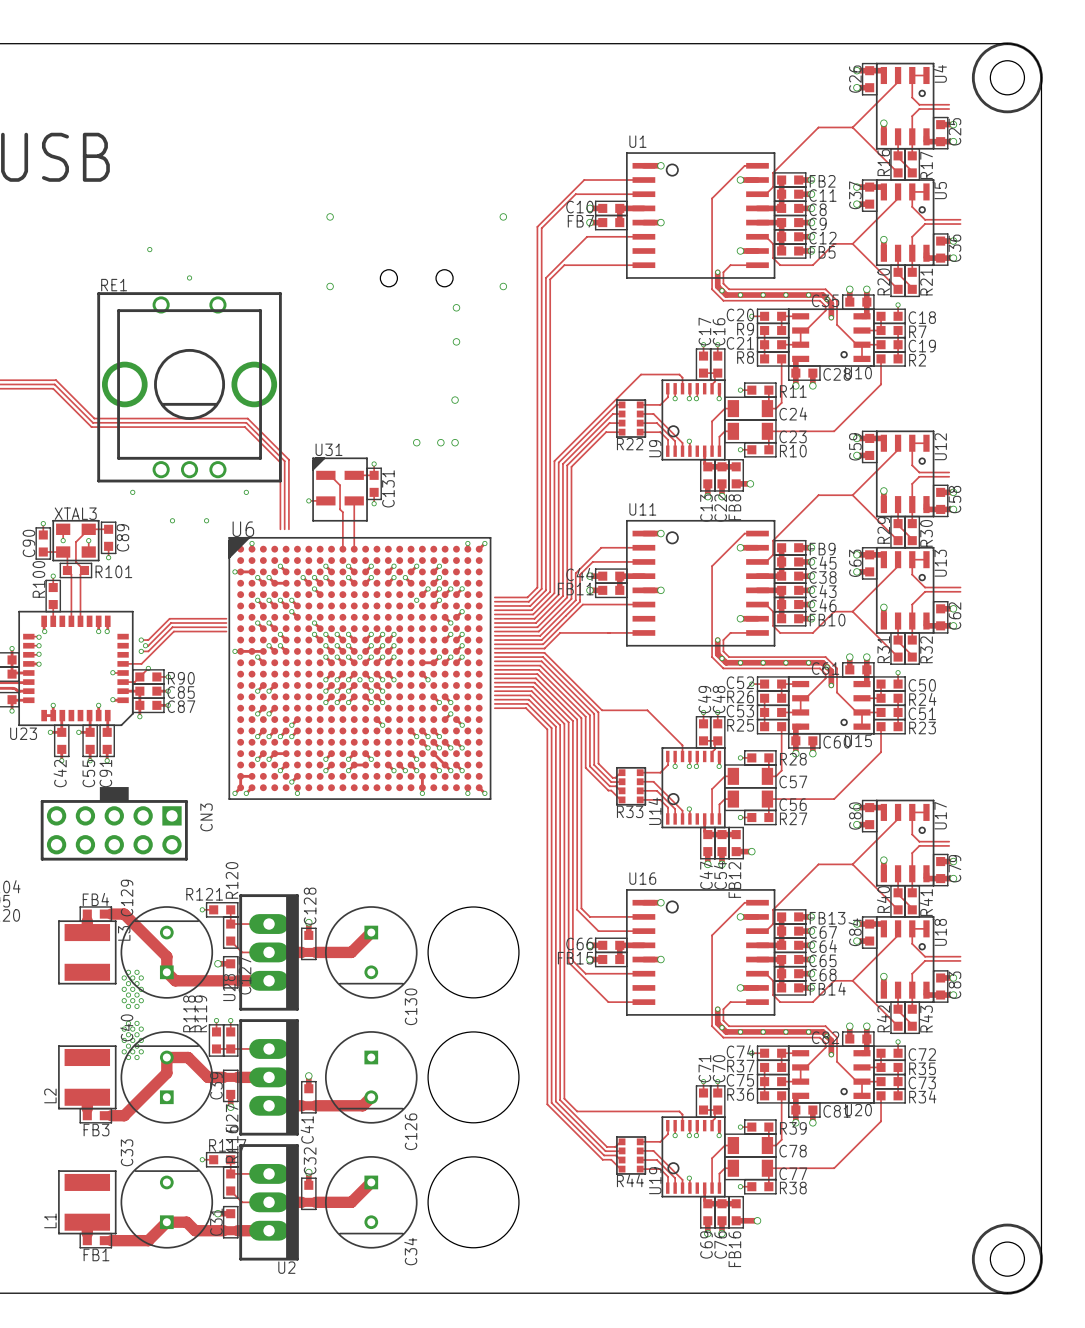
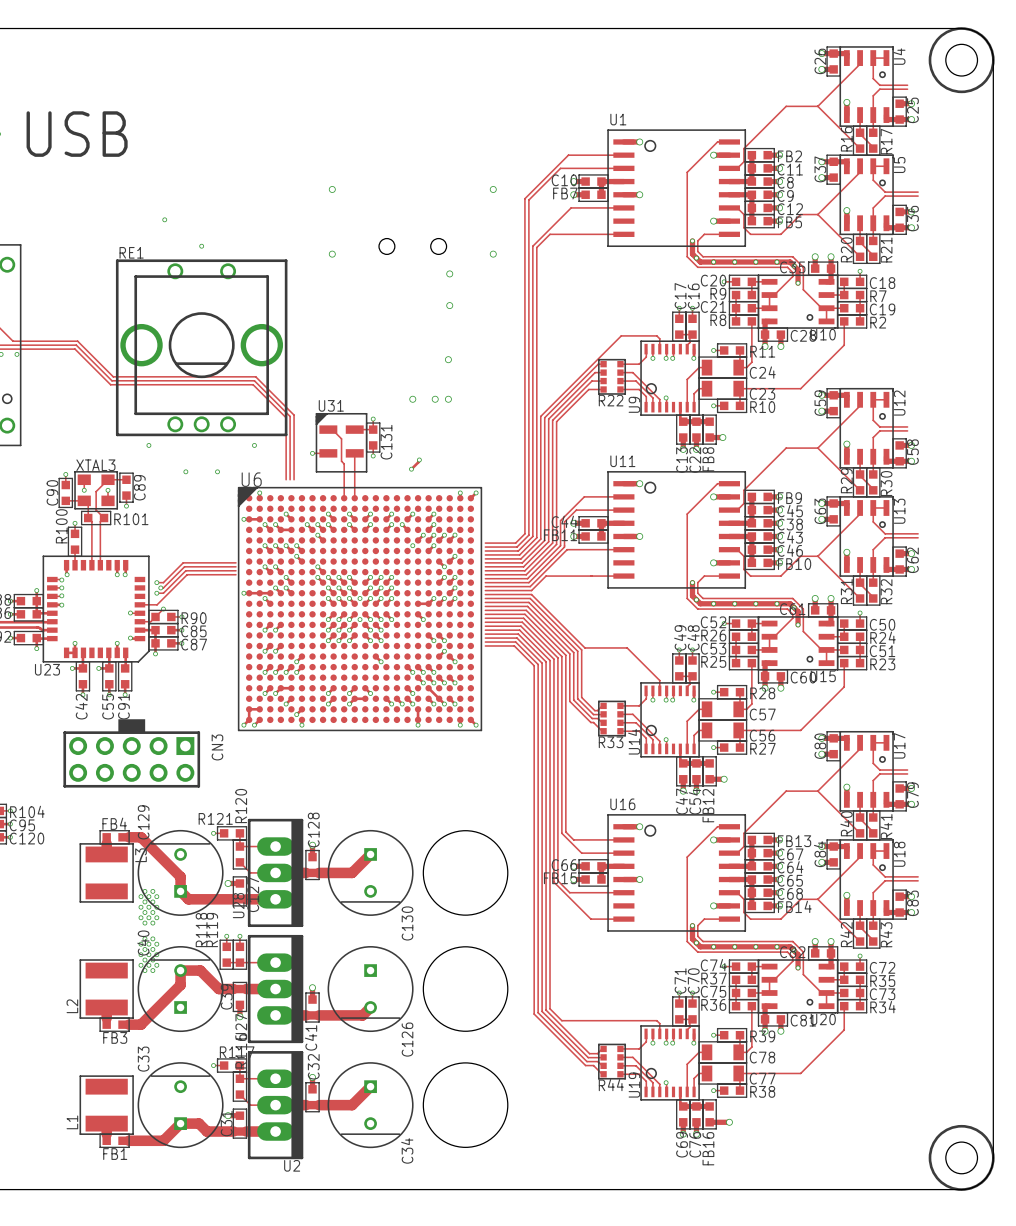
track: none -> (419, 459) (411, 469)
via: none -> (419, 459)
via: none -> (411, 469)

